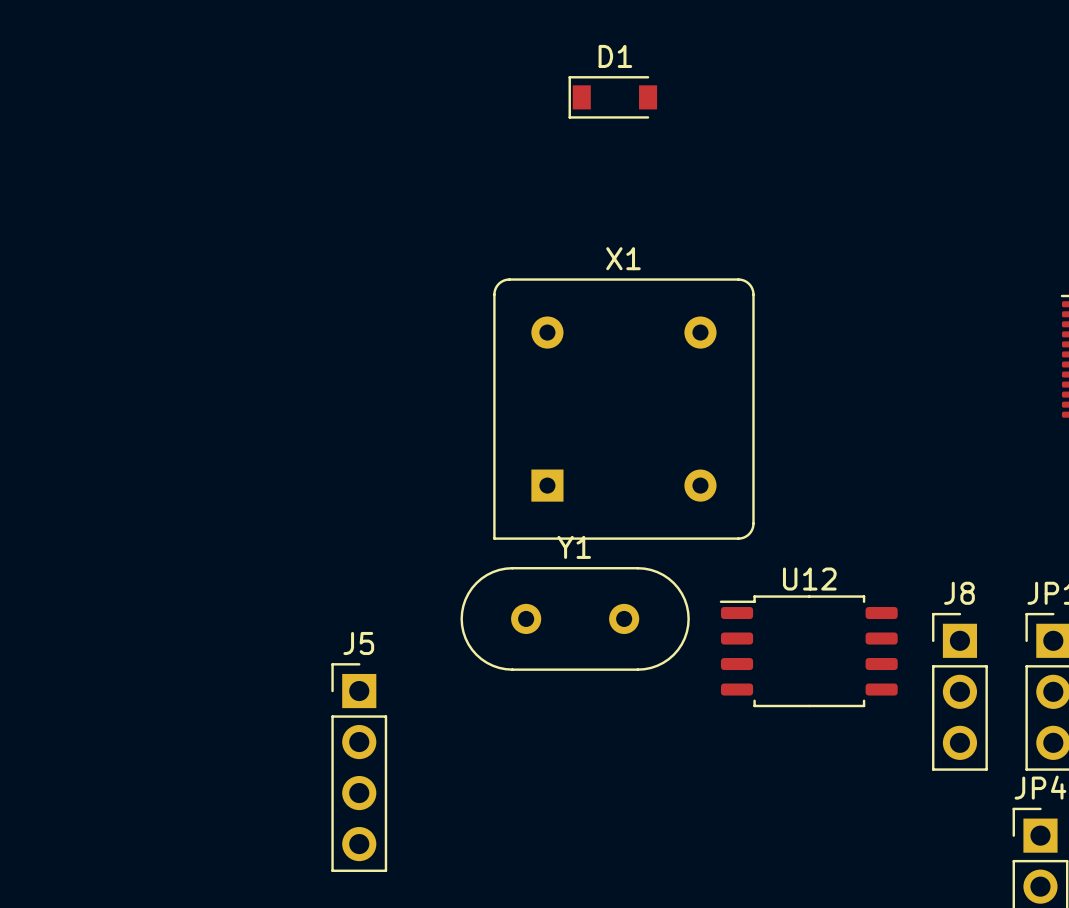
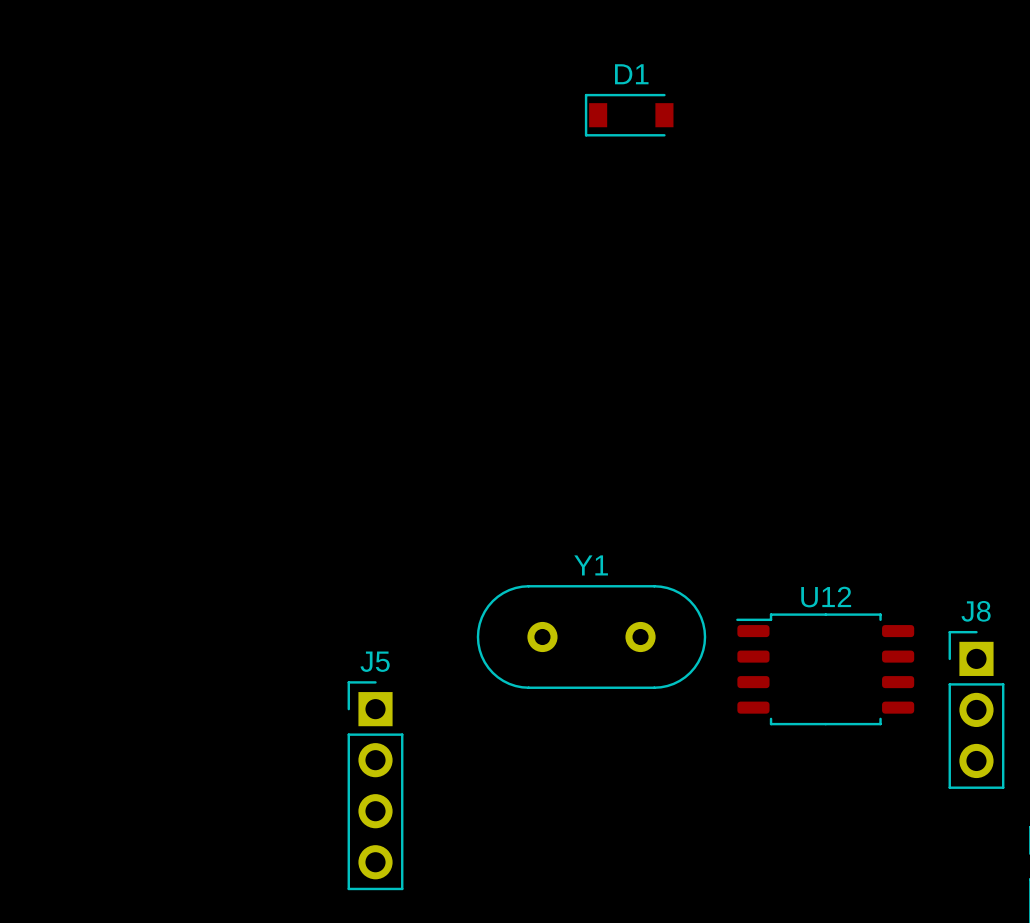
X1: (623, 409) -> none

